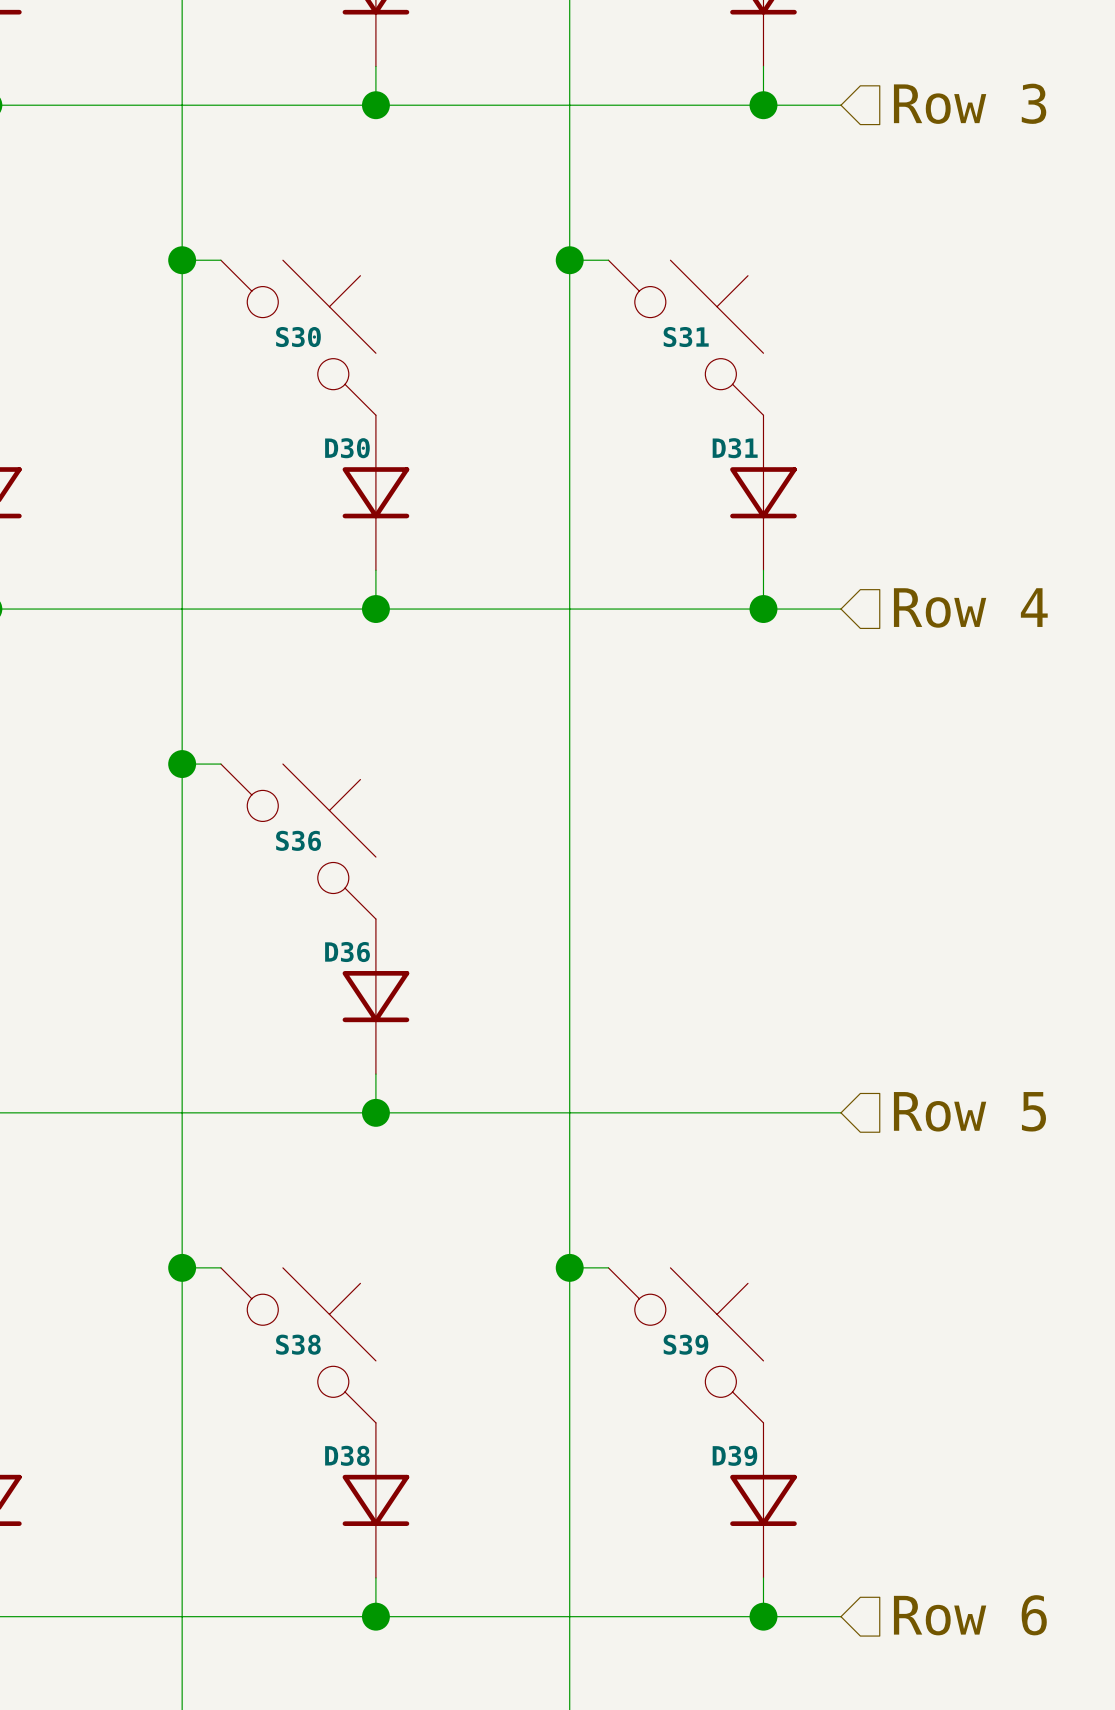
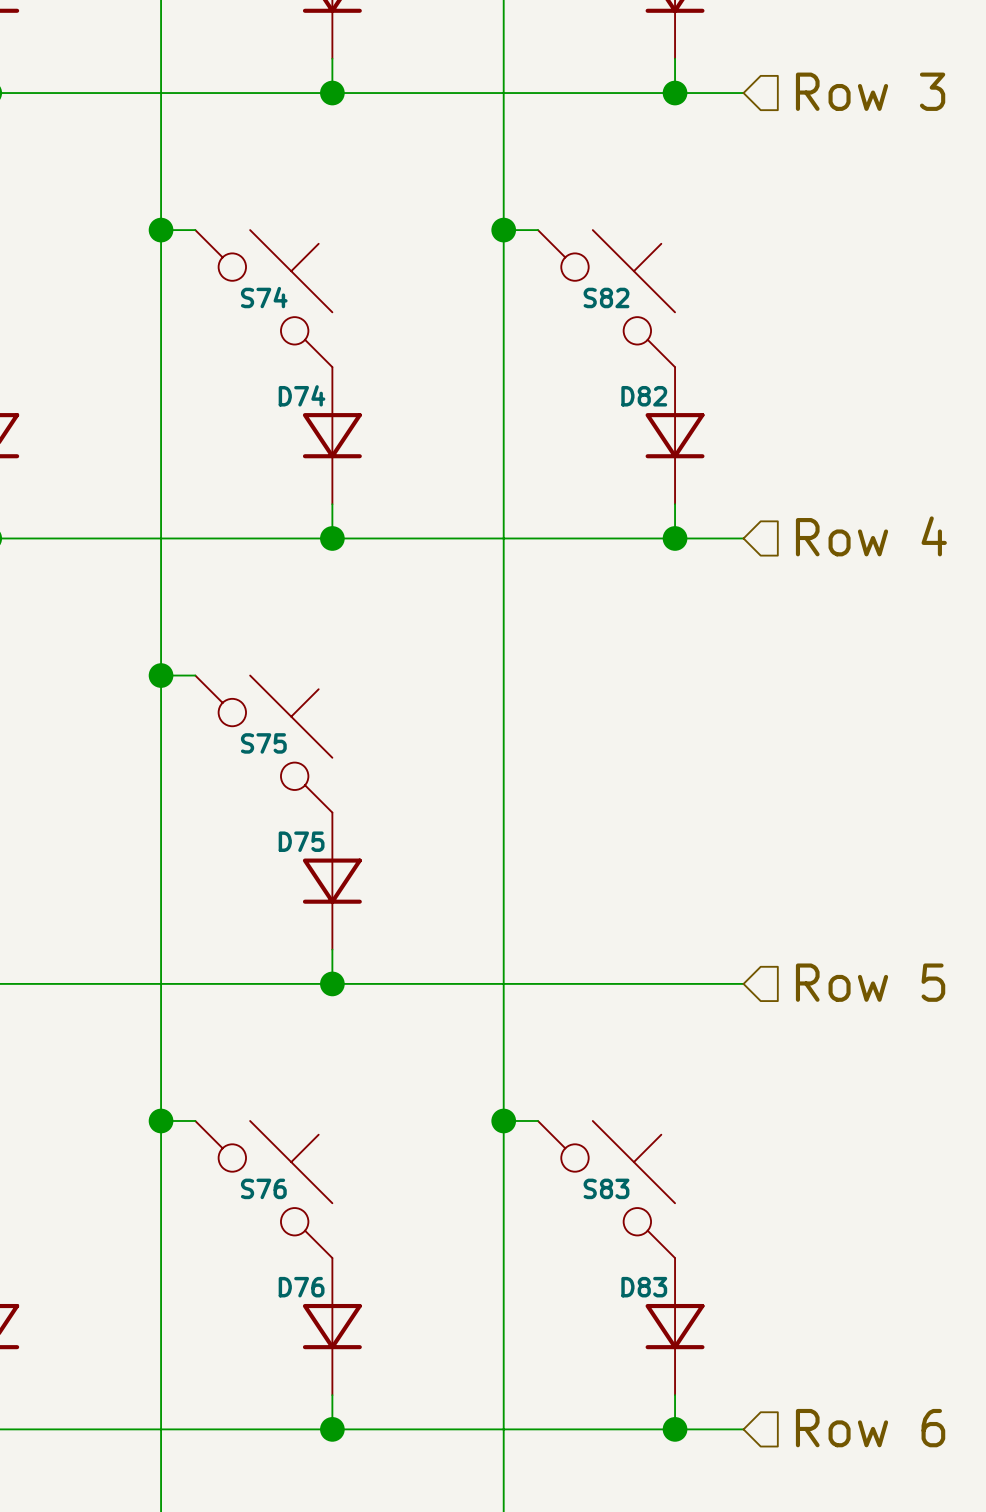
S30 name: S30 (298, 337) -> S74 (264, 297)
S31 name: S31 (686, 337) -> S82 (606, 297)
D30 name: D30 (347, 448) -> D74 (302, 395)
D31 name: D31 (735, 448) -> D82 (644, 396)
S36 name: S36 (298, 840) -> S75 (263, 743)
D36 name: D36 (347, 952) -> D75 (301, 841)
S38 name: S38 (298, 1344) -> S76 (263, 1188)
S39 name: S39 (685, 1344) -> S83 (606, 1188)
D38 name: D38 (347, 1455) -> D76 (301, 1287)
D39 name: D39 (734, 1455) -> D83 (644, 1287)

